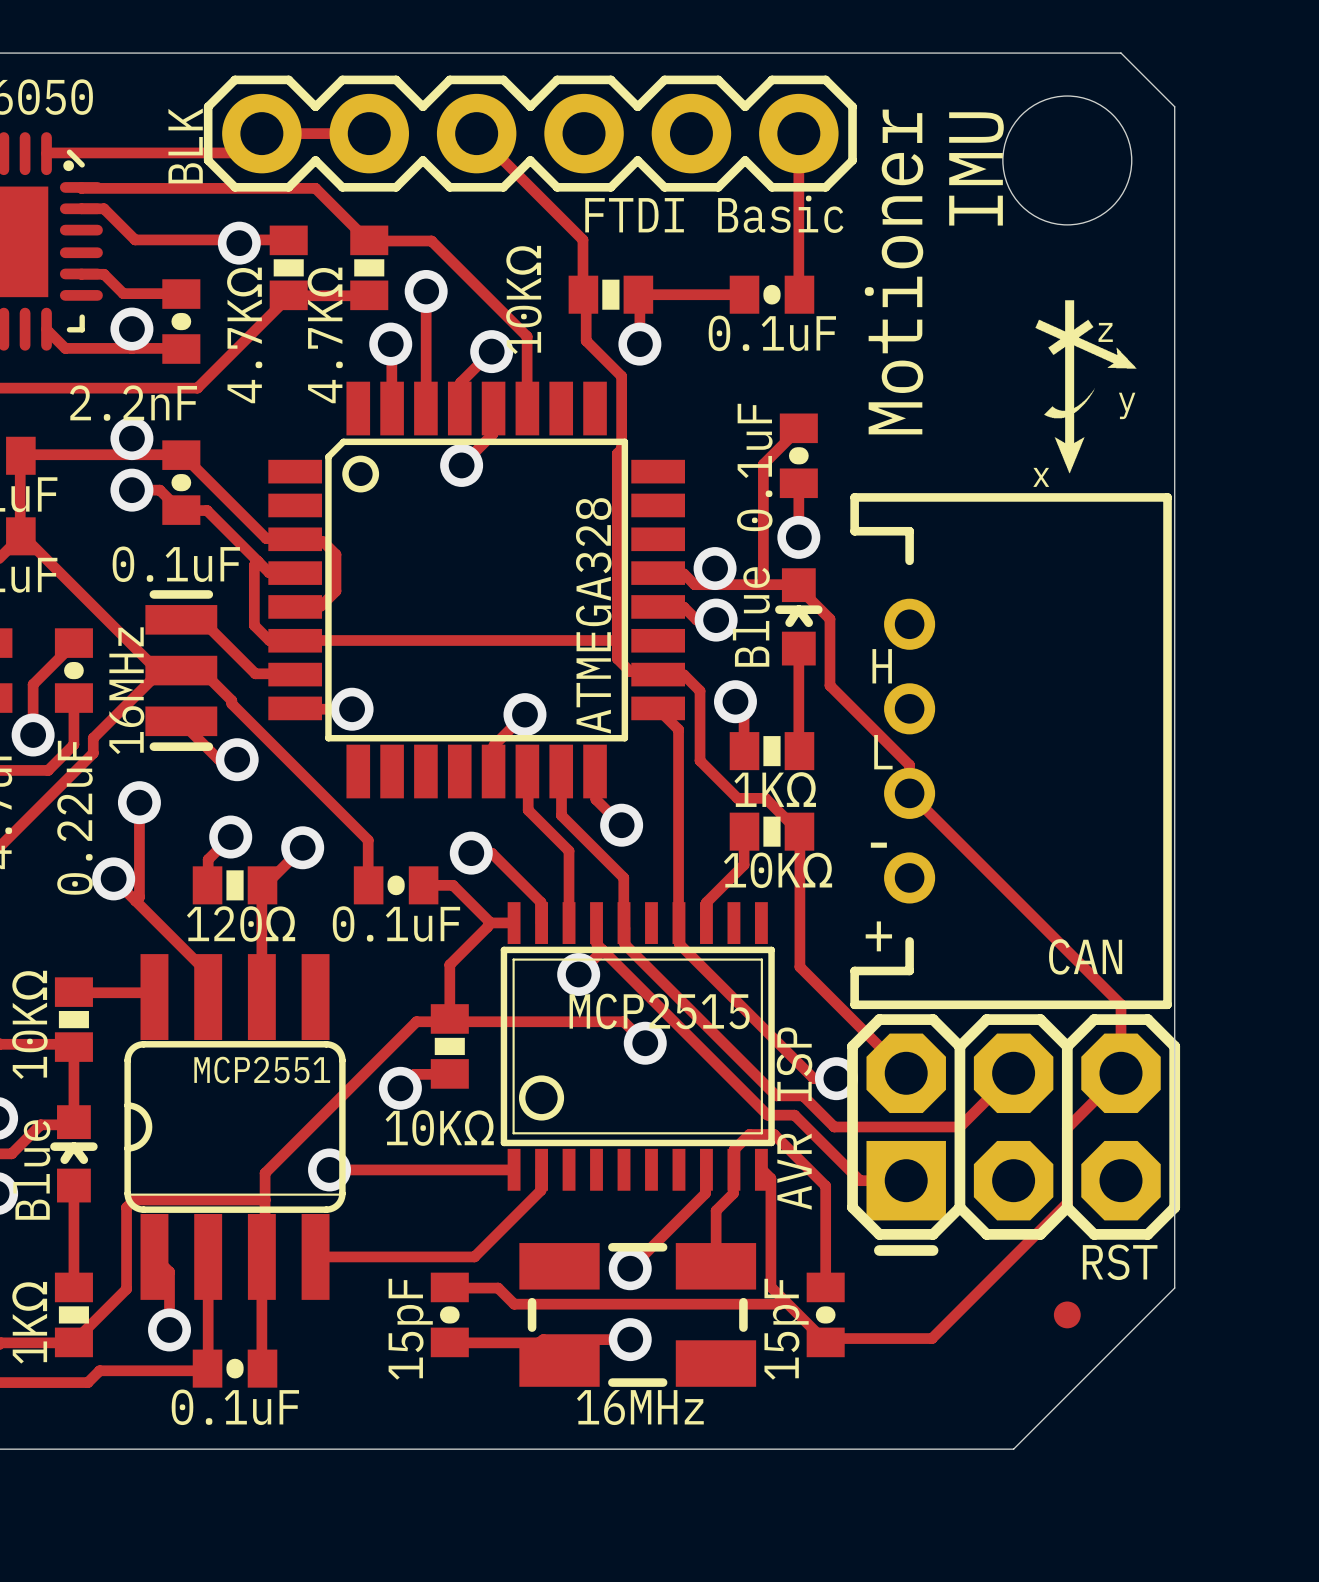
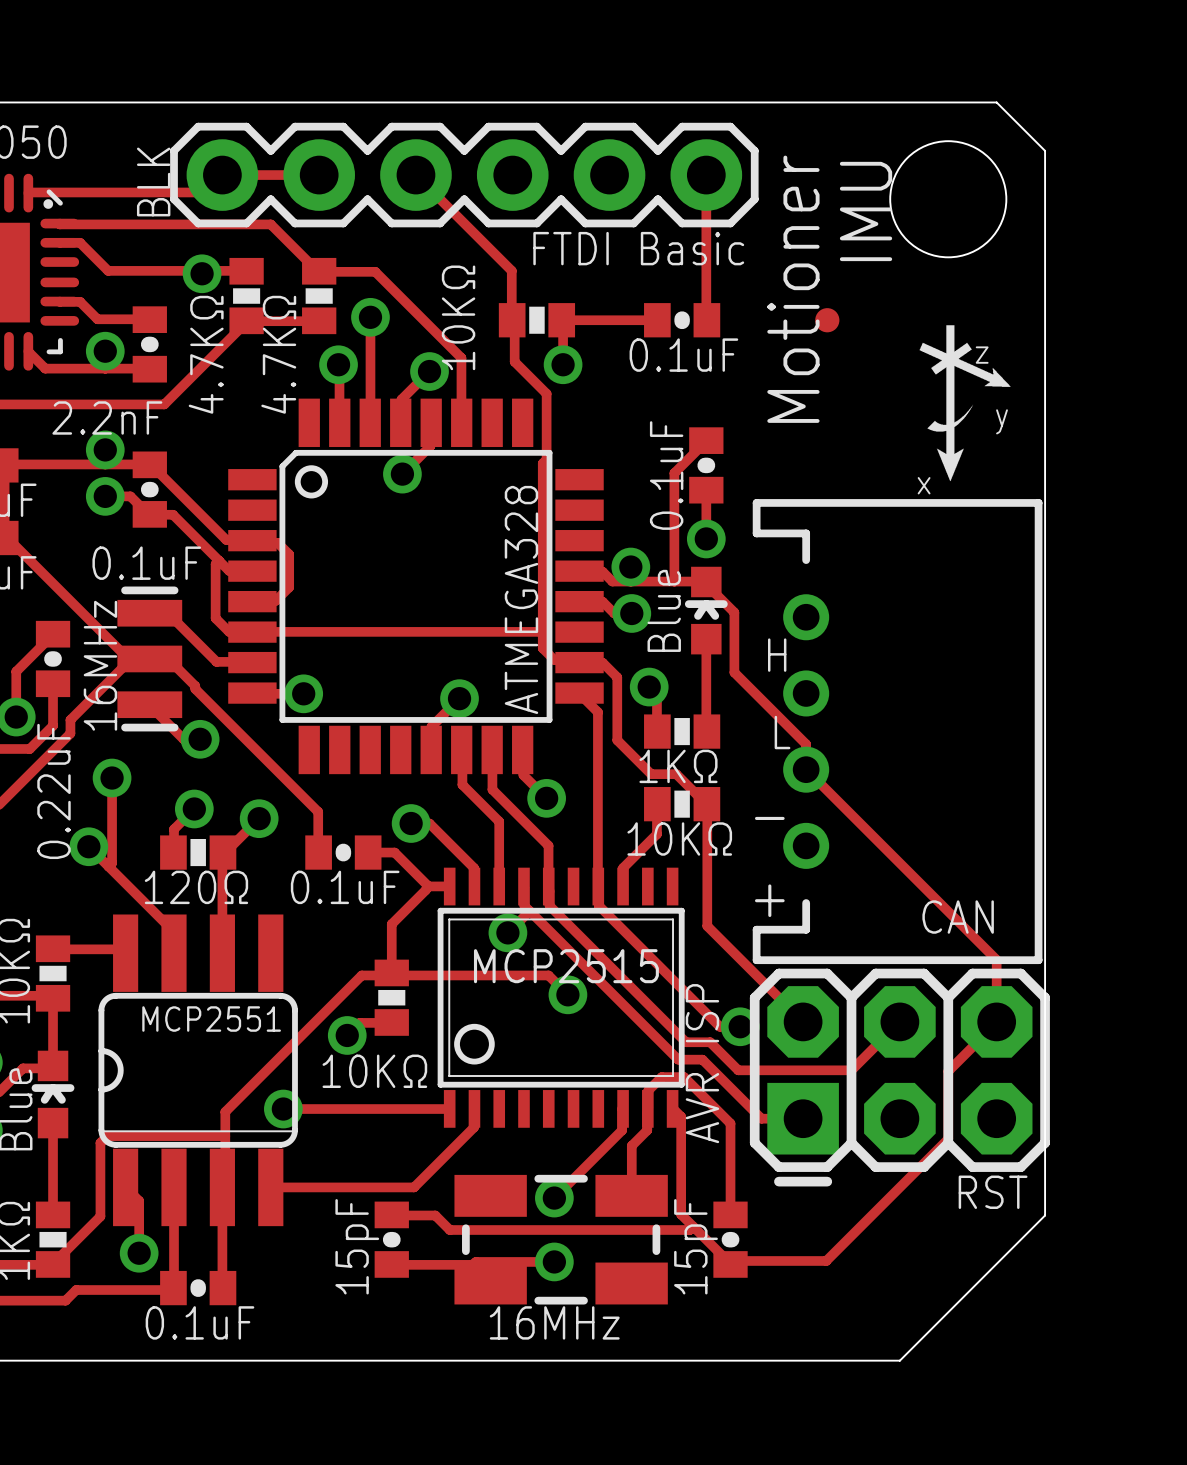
part position: (1067, 1314) -> (827, 320)

